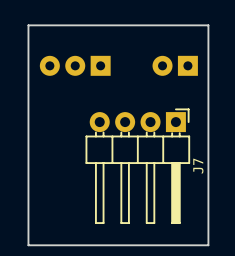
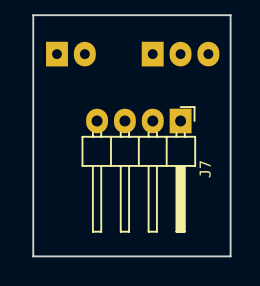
part: none -> (70, 54)
part: none -> (180, 54)
part: (75, 65) -> none
part: (175, 65) -> none
J7 footprint: [85, 108, 190, 224] -> [81, 106, 196, 233]

